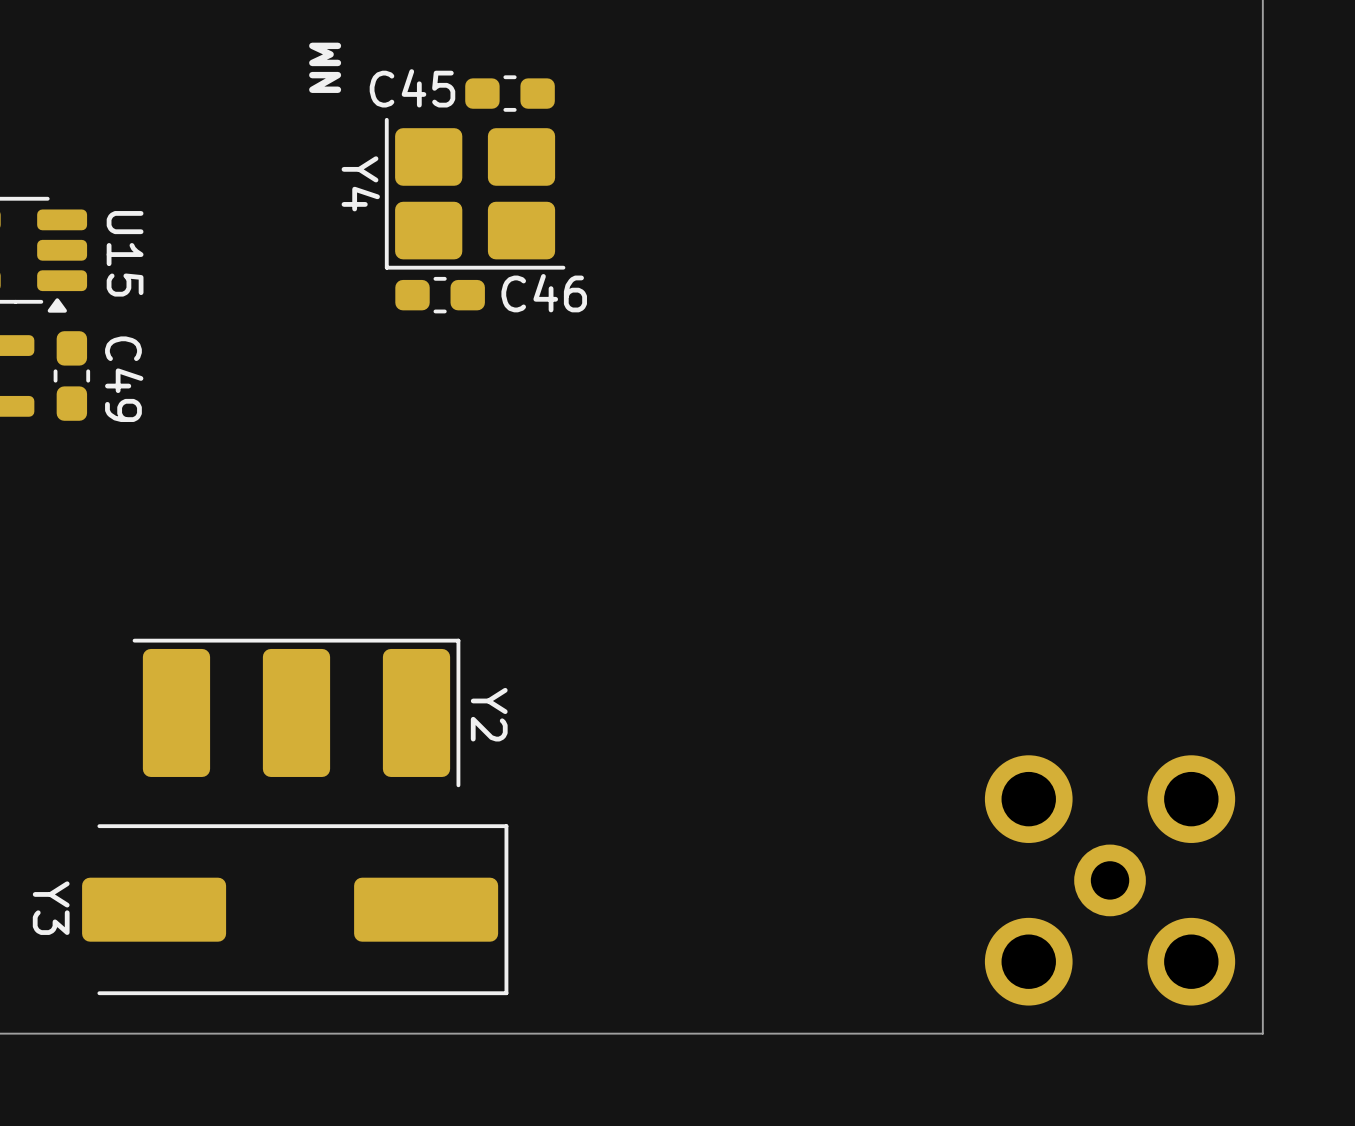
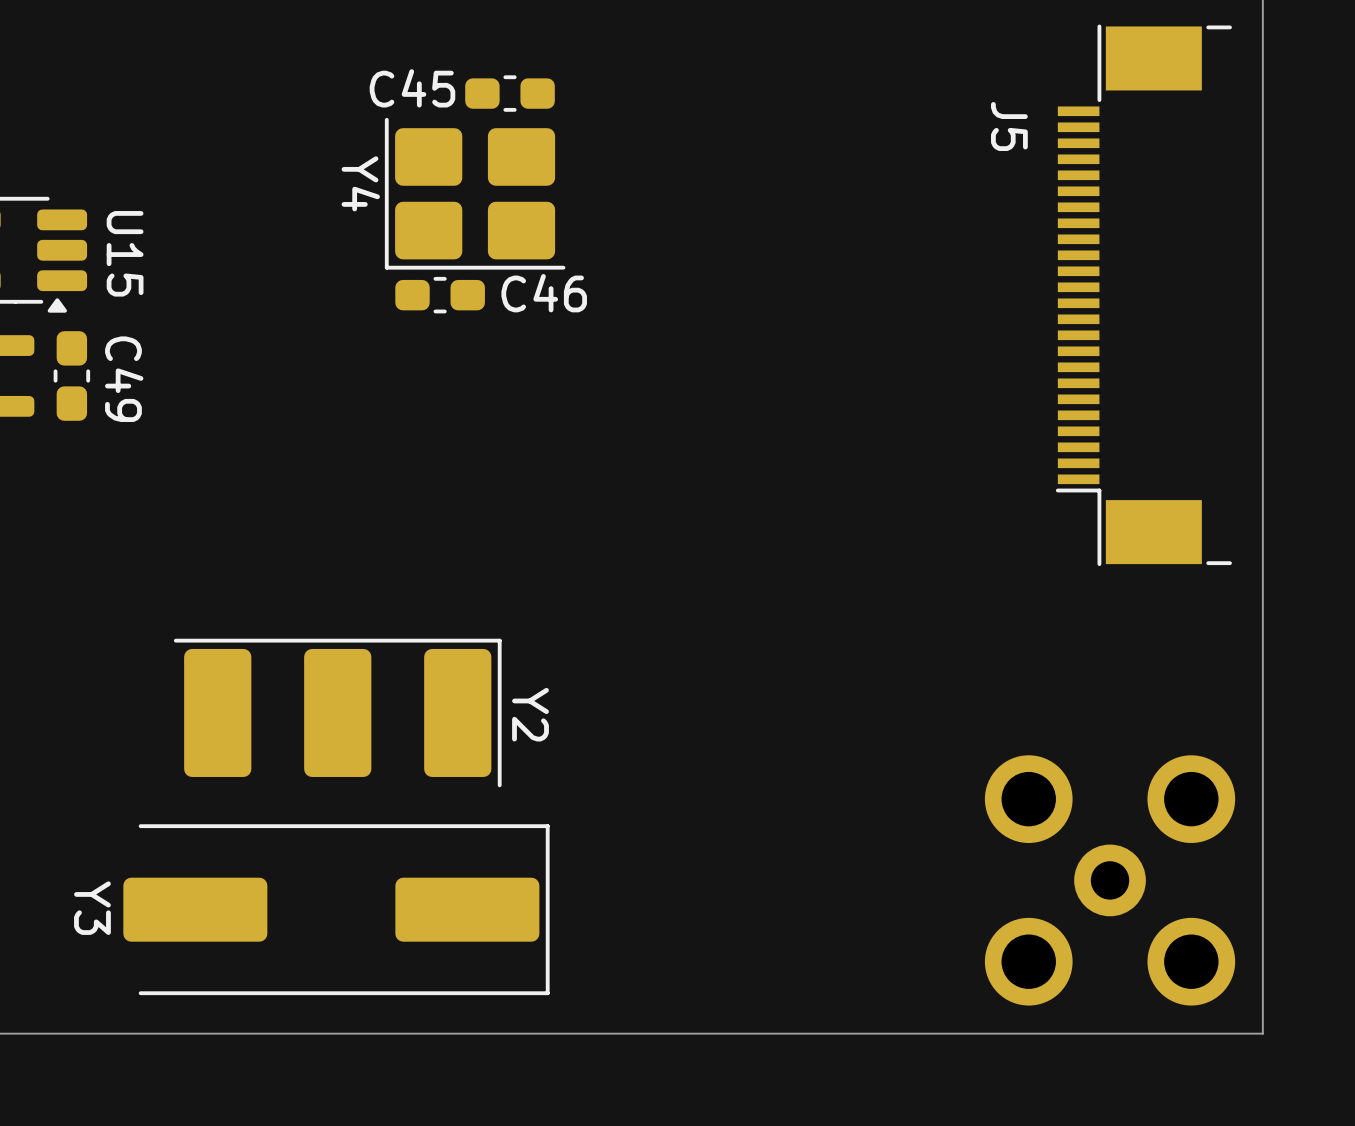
text: NM (325, 67) -> none
J5: none -> (1143, 295)
Y2 position: (296, 712) -> (337, 712)
Y3 position: (295, 909) -> (336, 909)

